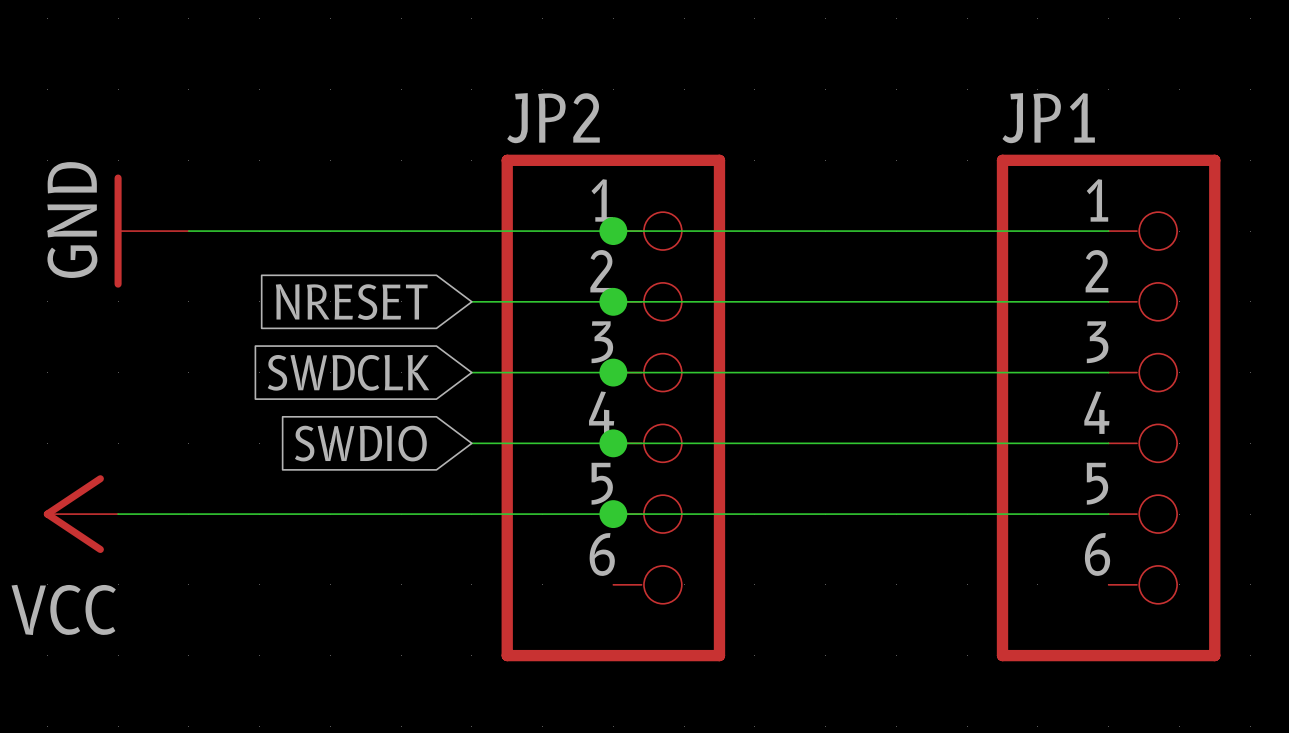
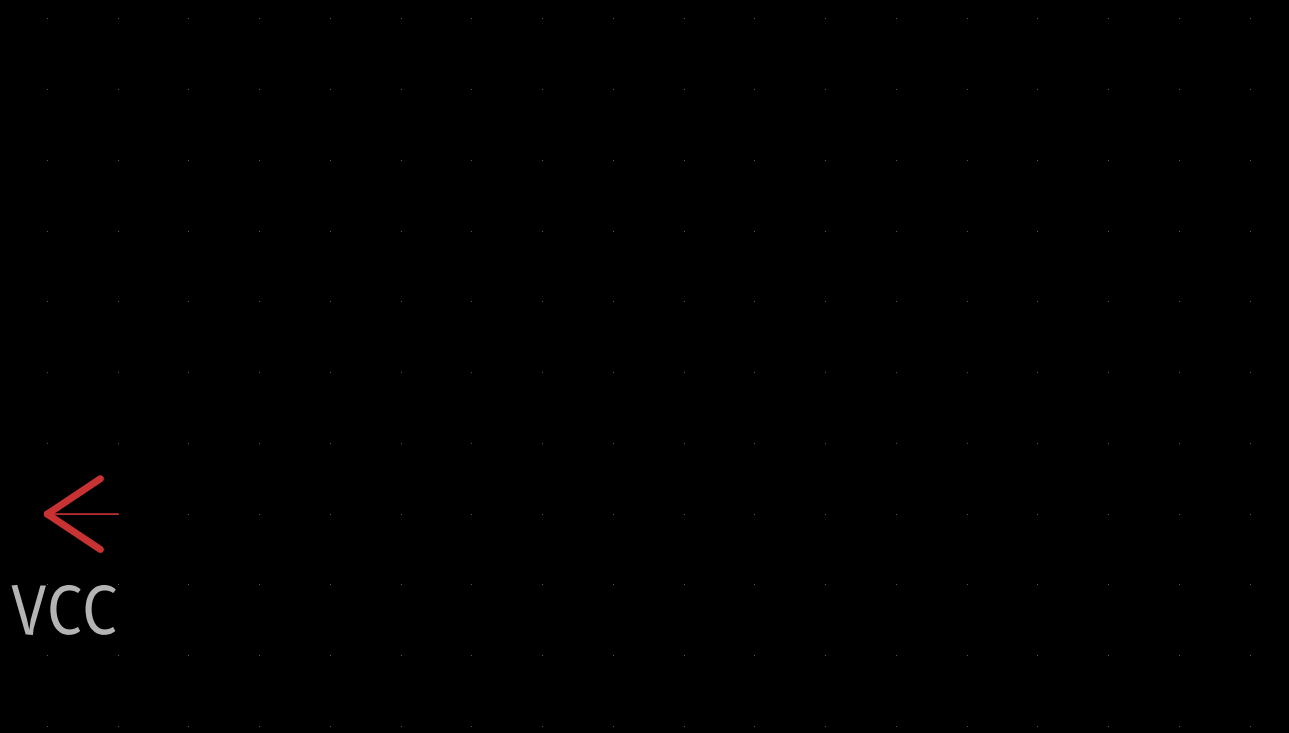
power symbol: GND (151, 231) -> none
wire: (188, 231) (1108, 231) -> none
junction: (613, 231) -> none
wire: (471, 301) (1108, 301) -> none
junction: (613, 301) -> none
global label: NRESET (351, 302) -> none
global label: SWDCLK (348, 372) -> none
wire: (471, 372) (1108, 372) -> none
junction: (613, 372) -> none
JP2: (613, 407) -> none
JP1: (1108, 407) -> none
global label: SWDIO (360, 443) -> none
wire: (471, 443) (1108, 443) -> none
junction: (613, 443) -> none
wire: (118, 514) (1108, 514) -> none
junction: (613, 514) -> none

